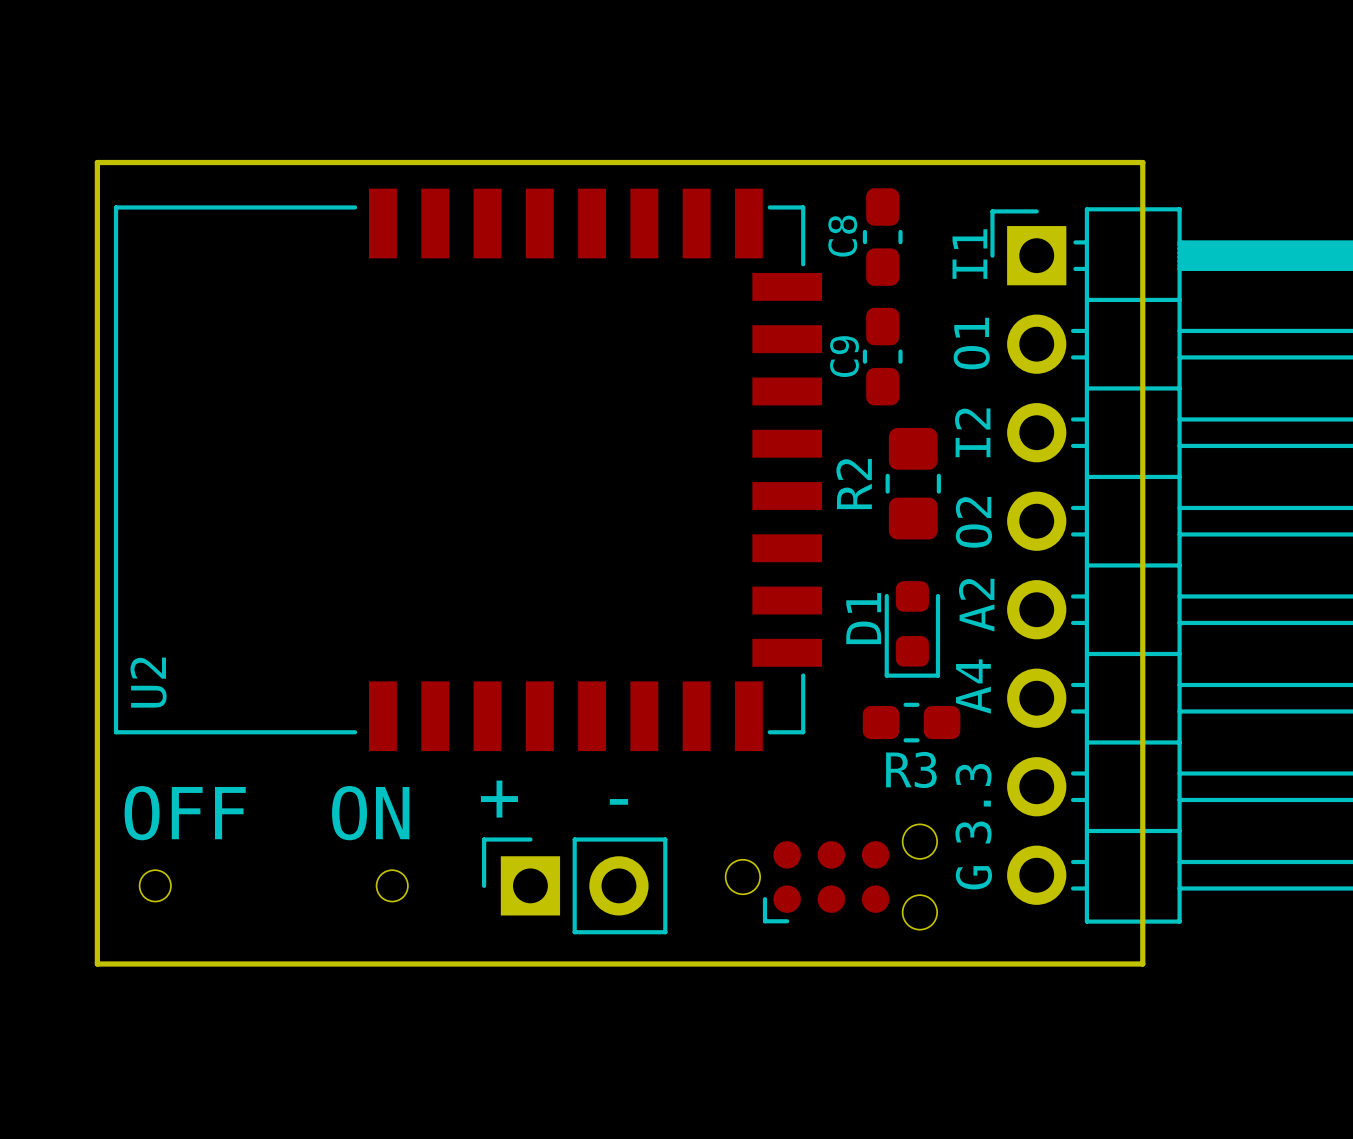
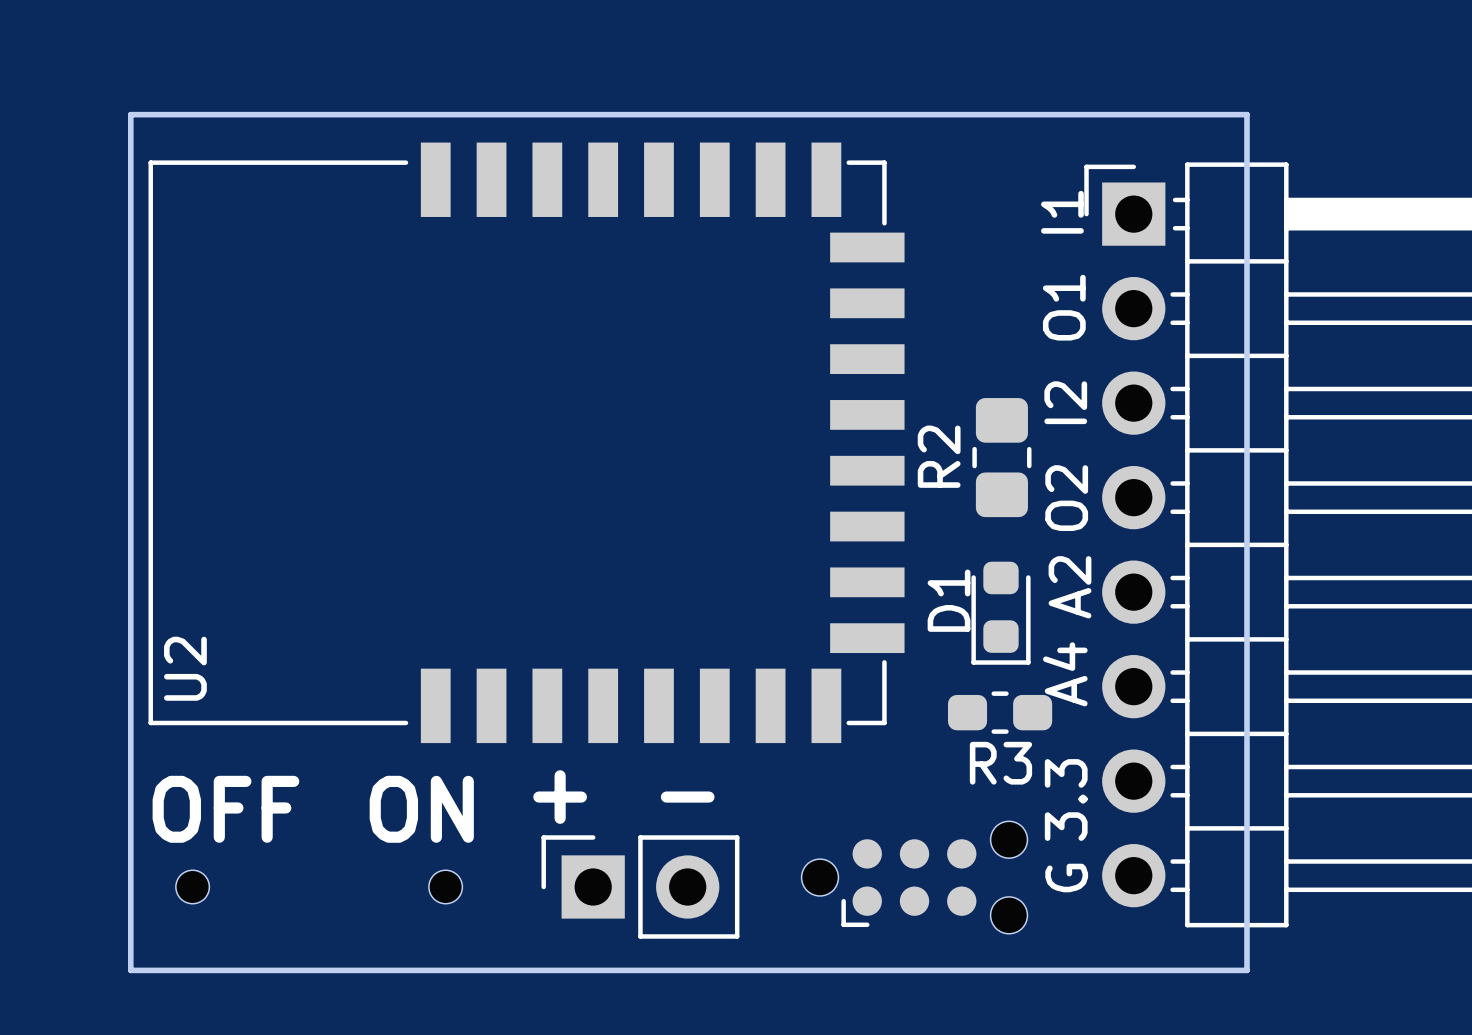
C8: (882, 237) -> none
C9: (882, 356) -> none

